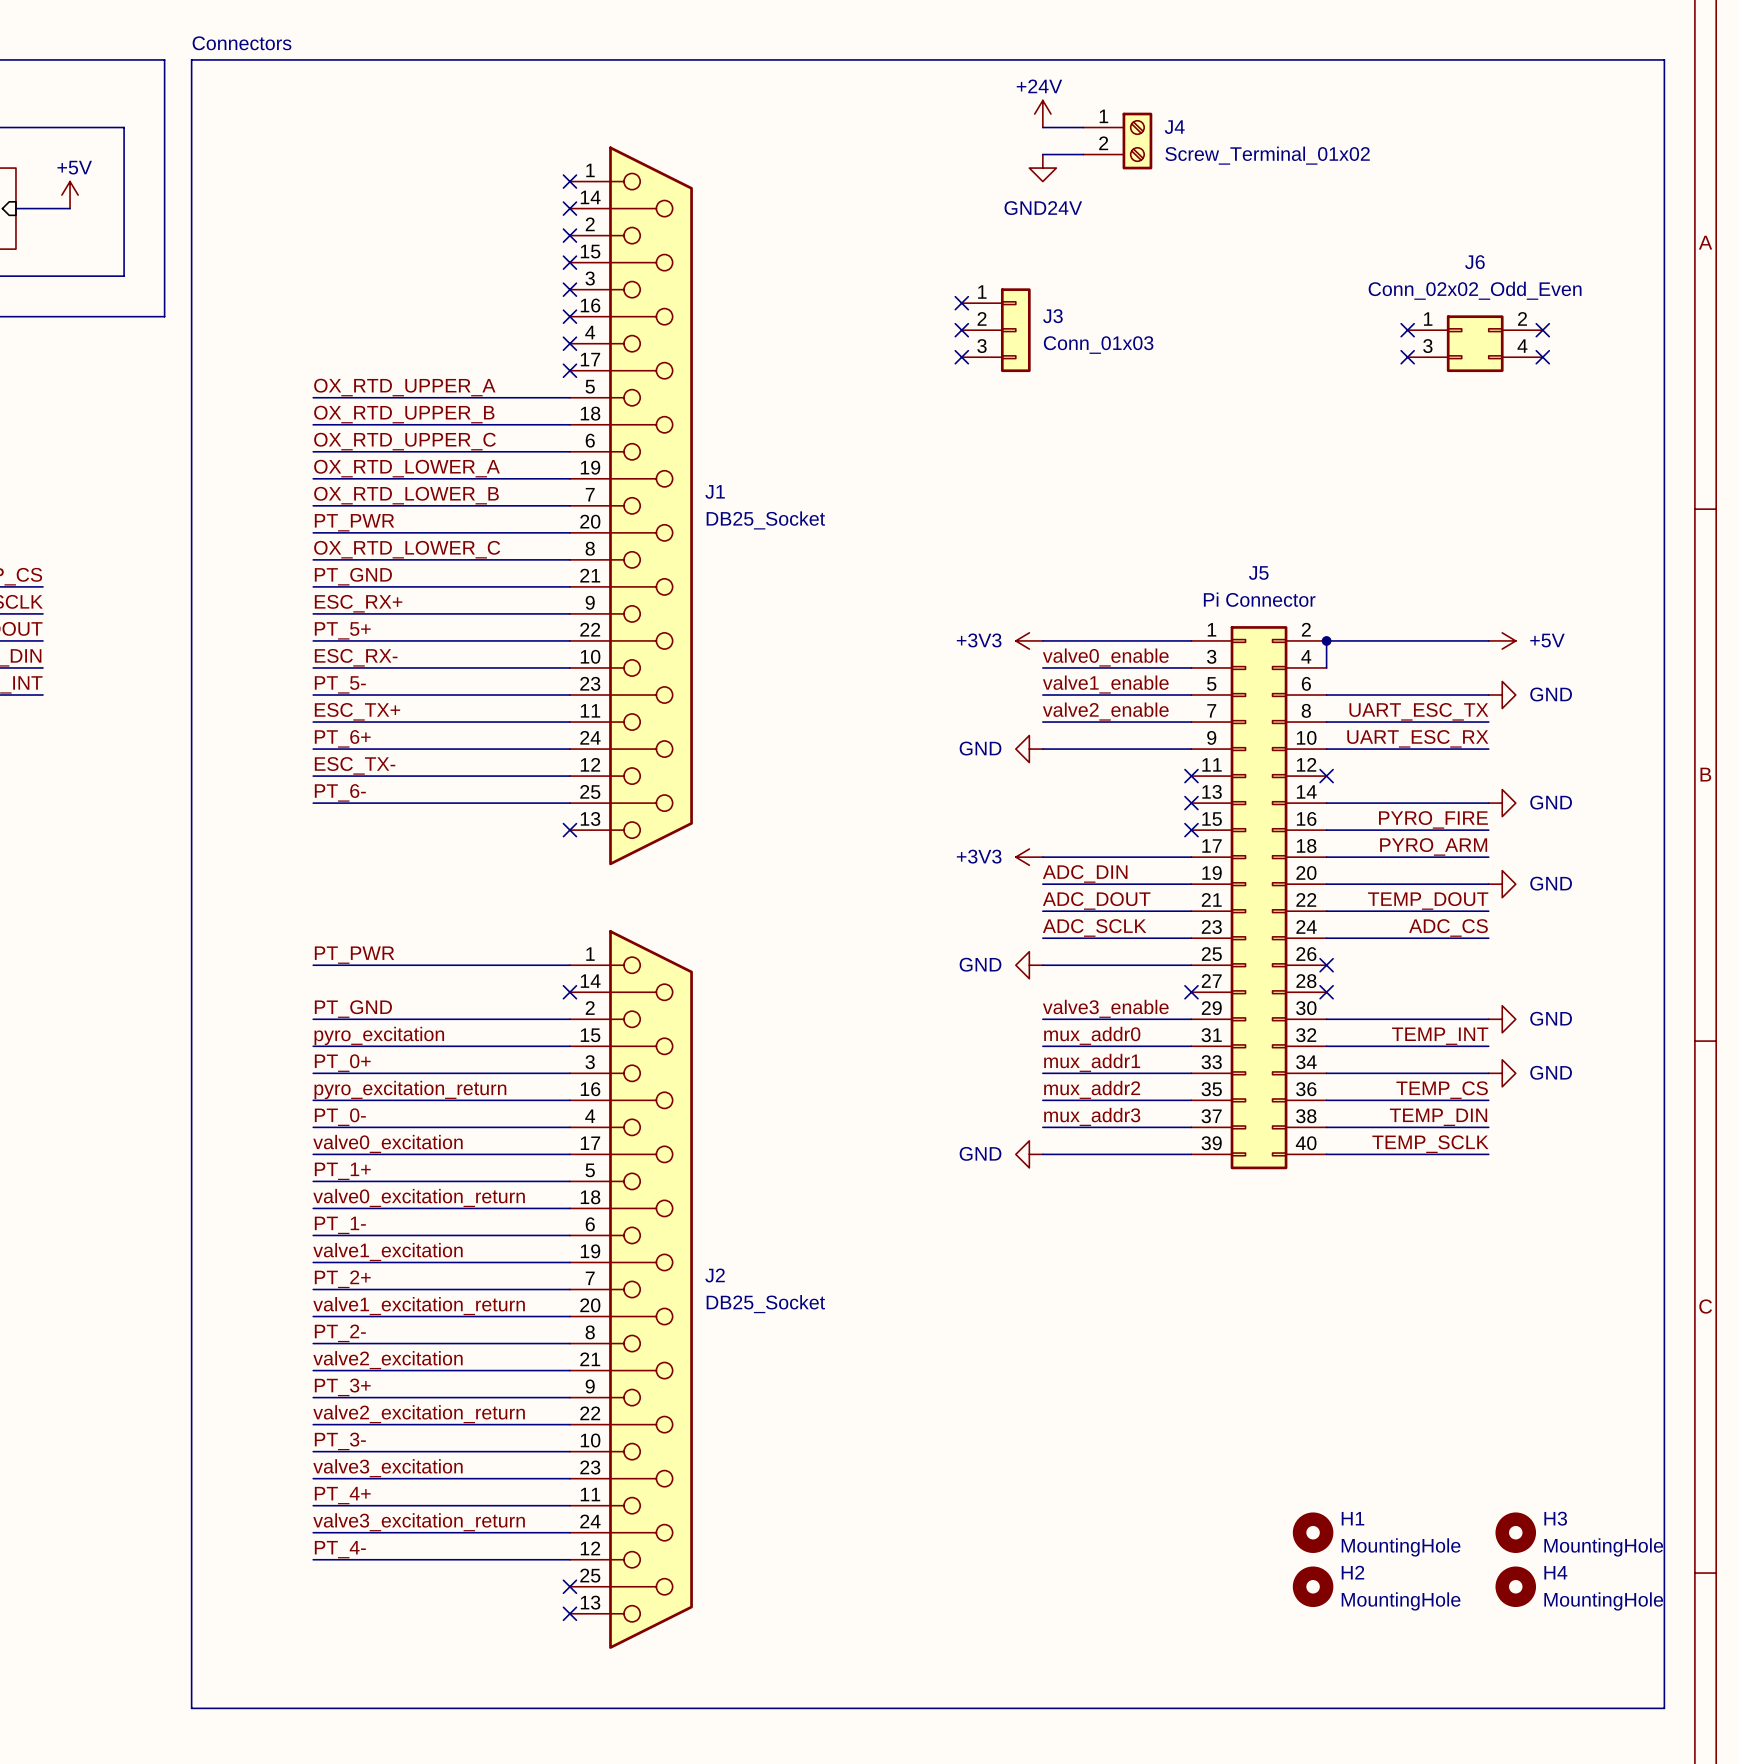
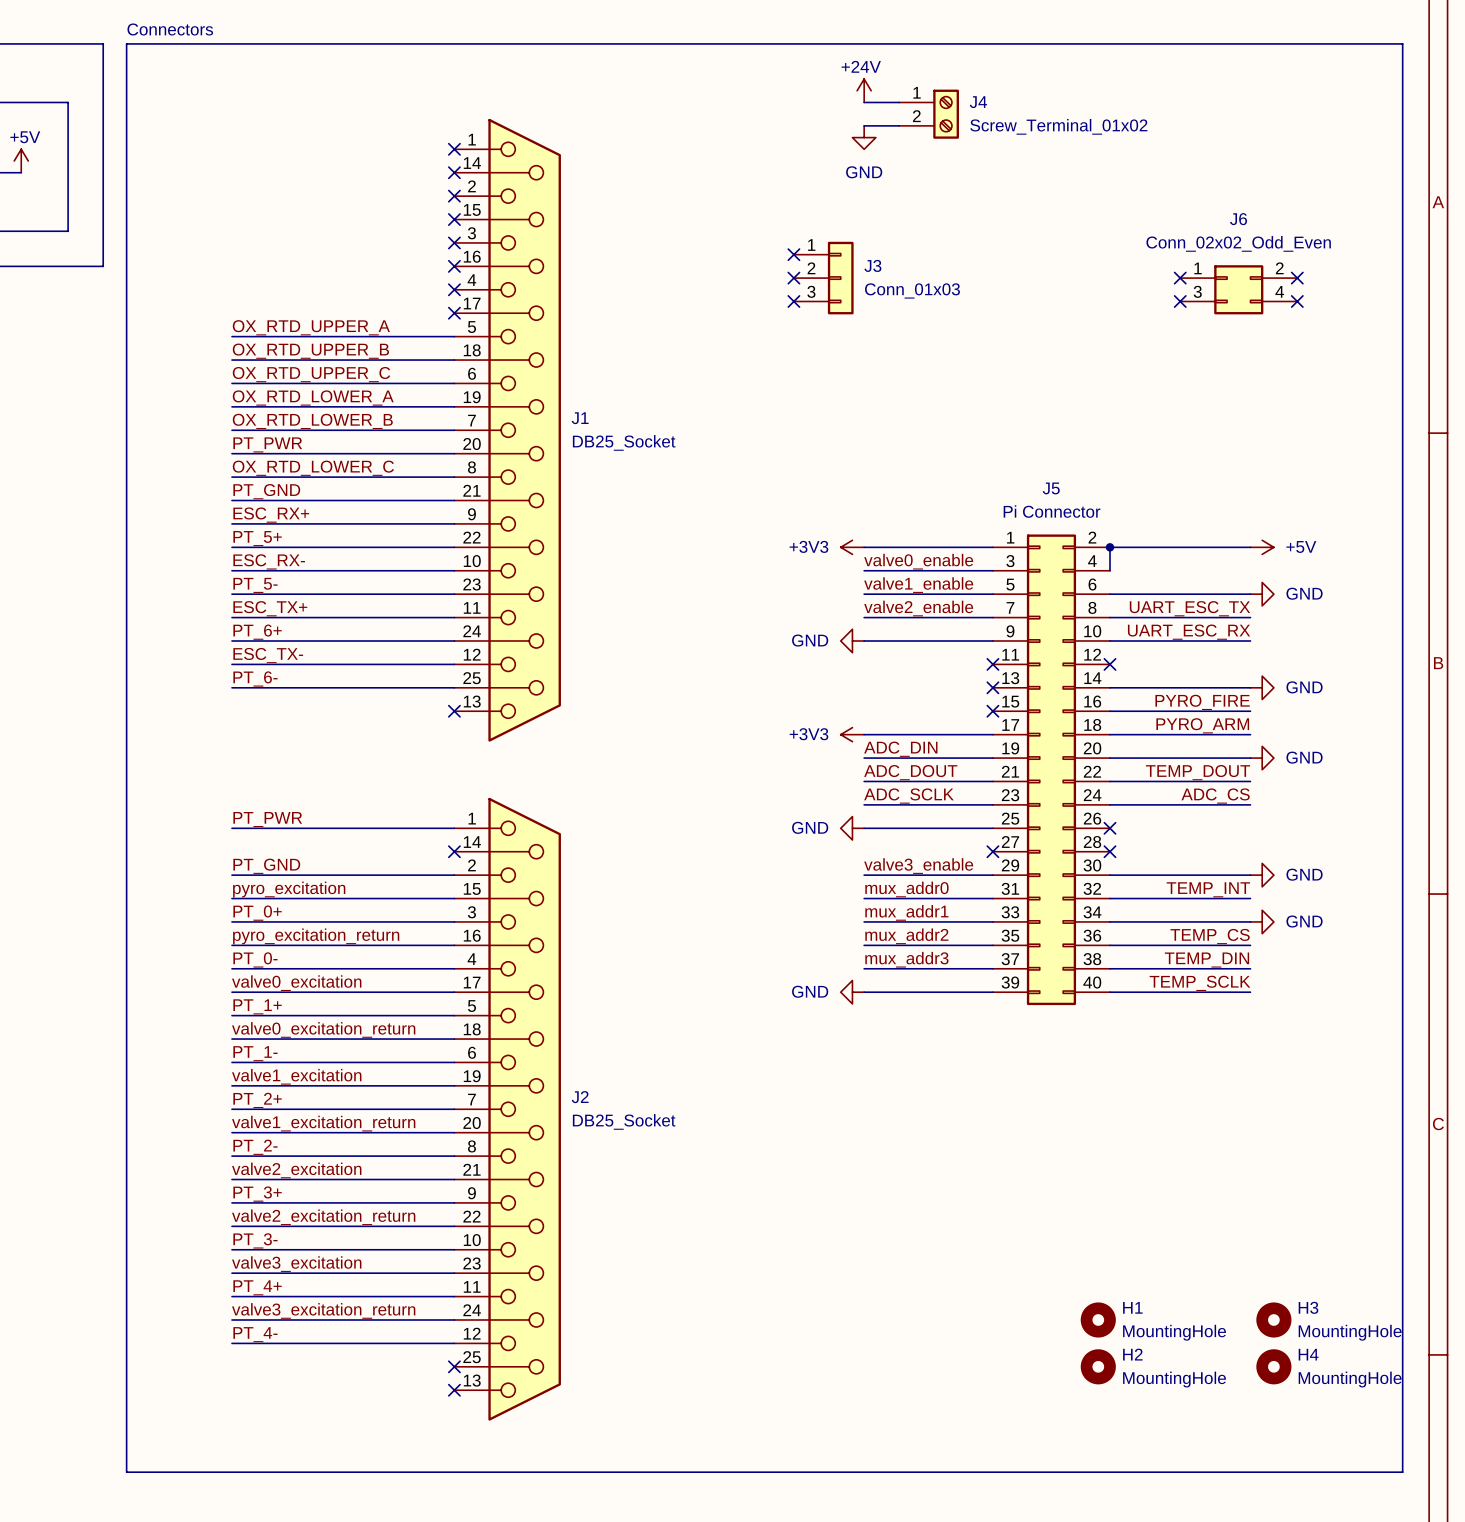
power symbol: GND24V (1042, 168) -> GND (864, 137)

